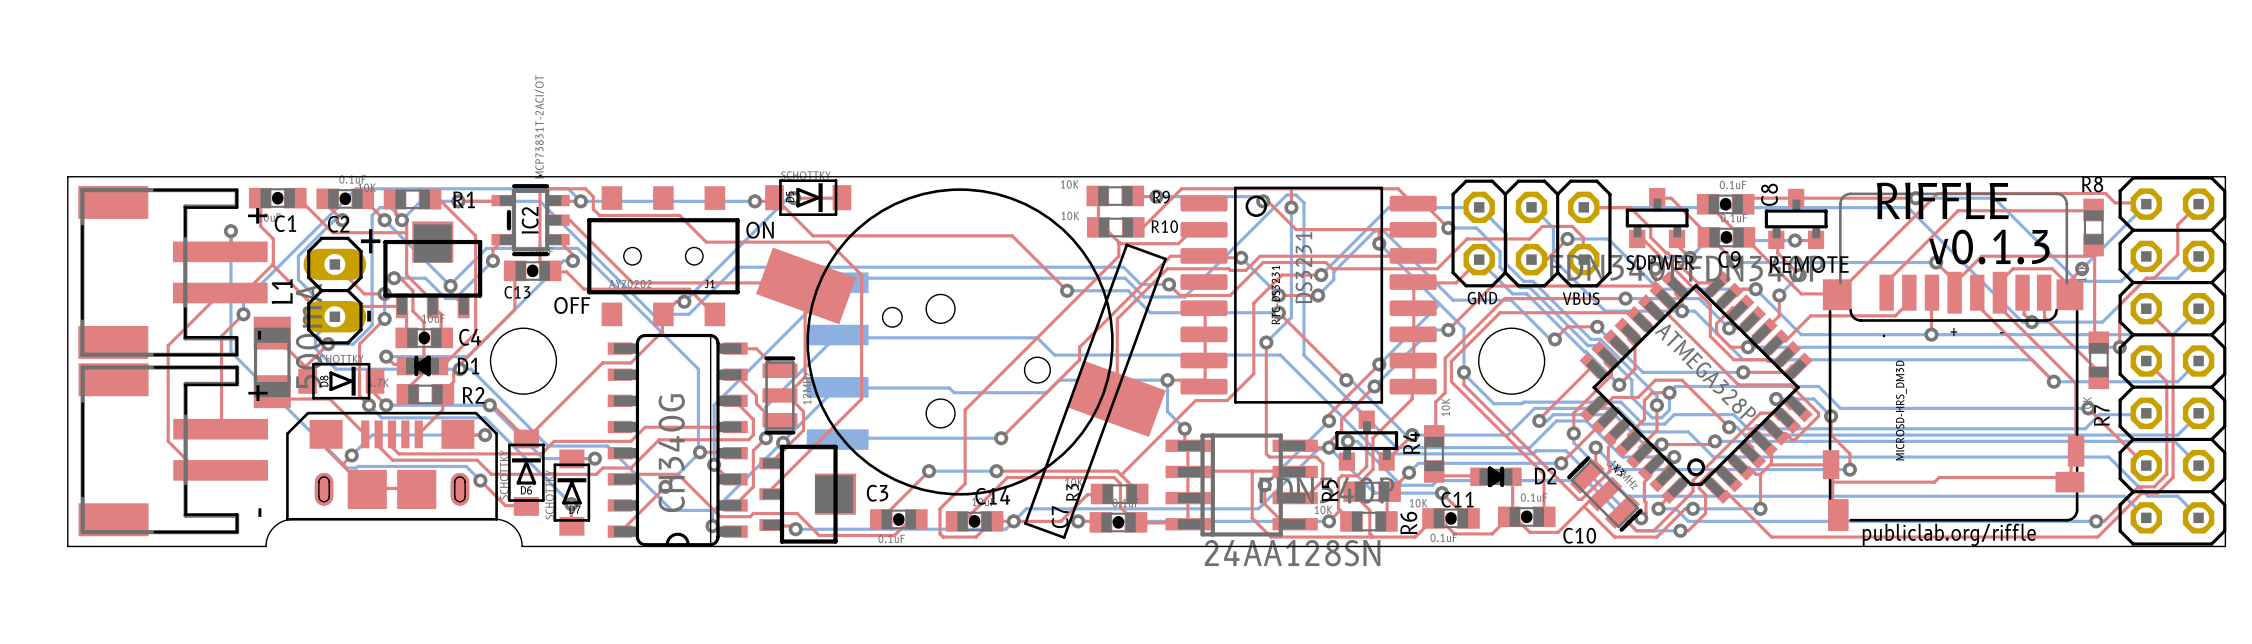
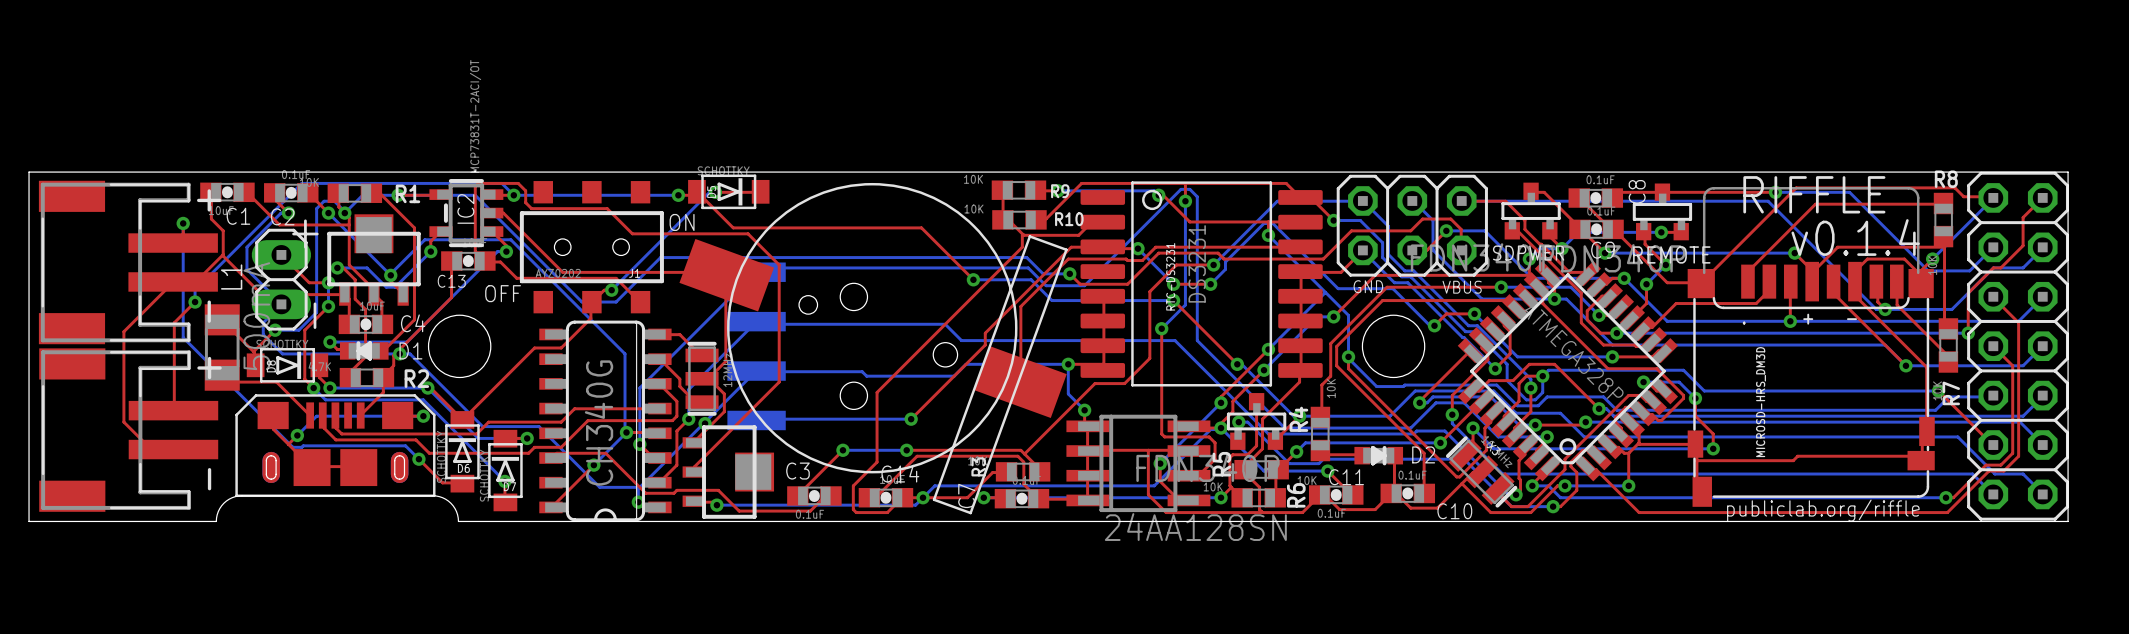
text: v0.1.3 (1989, 247) -> v0.1.4 (1855, 237)

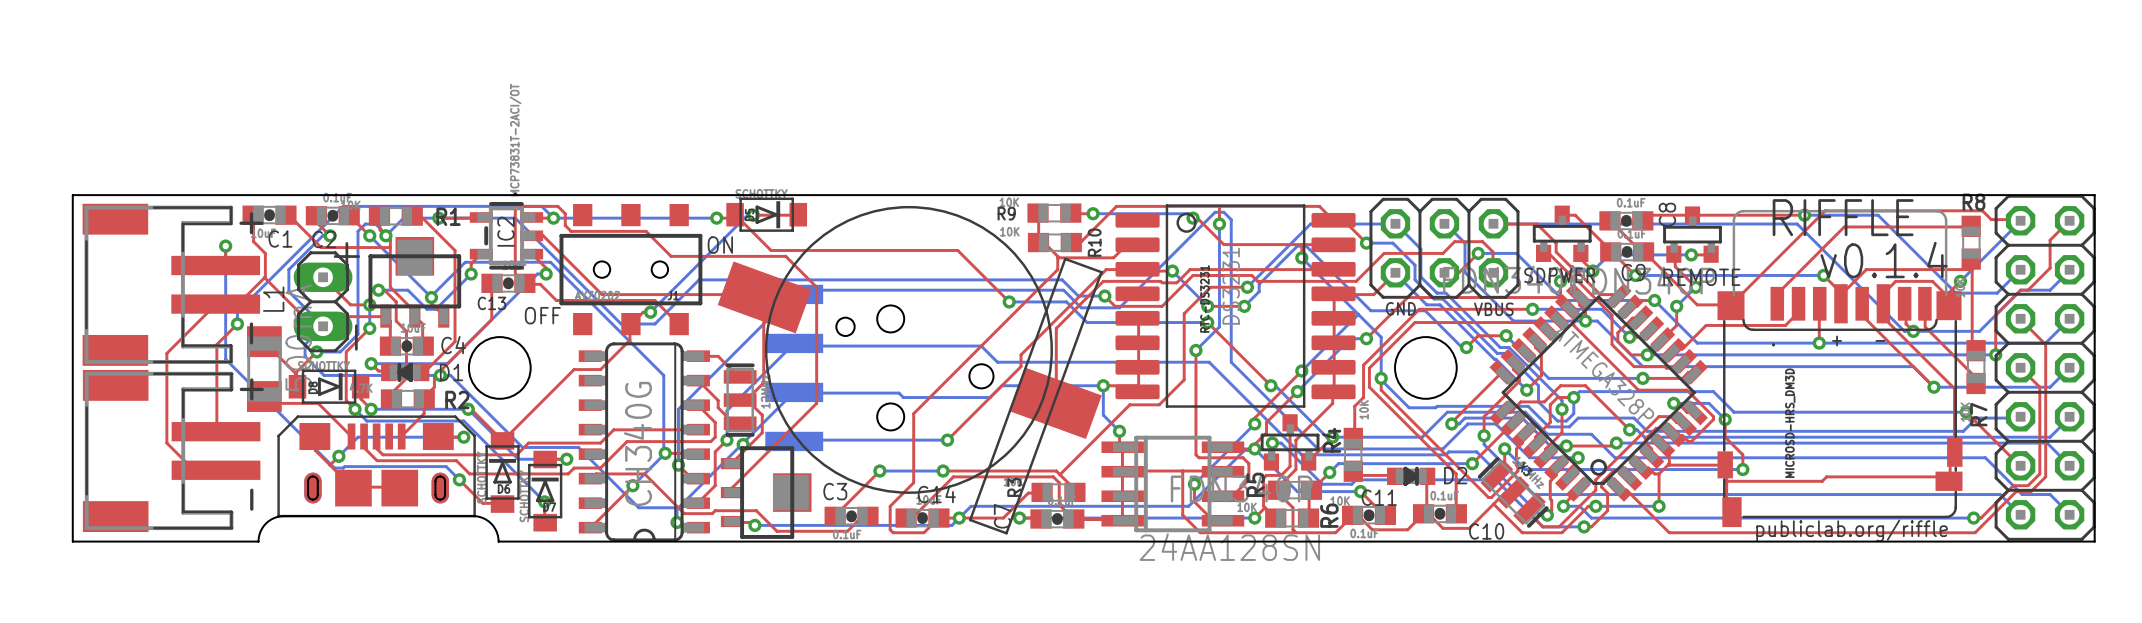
R9 name position: R9 (1060, 191) -> R9 (1006, 213)
R10 name rotation: 0° (1069, 219) -> 90° counterclockwise (1094, 242)

